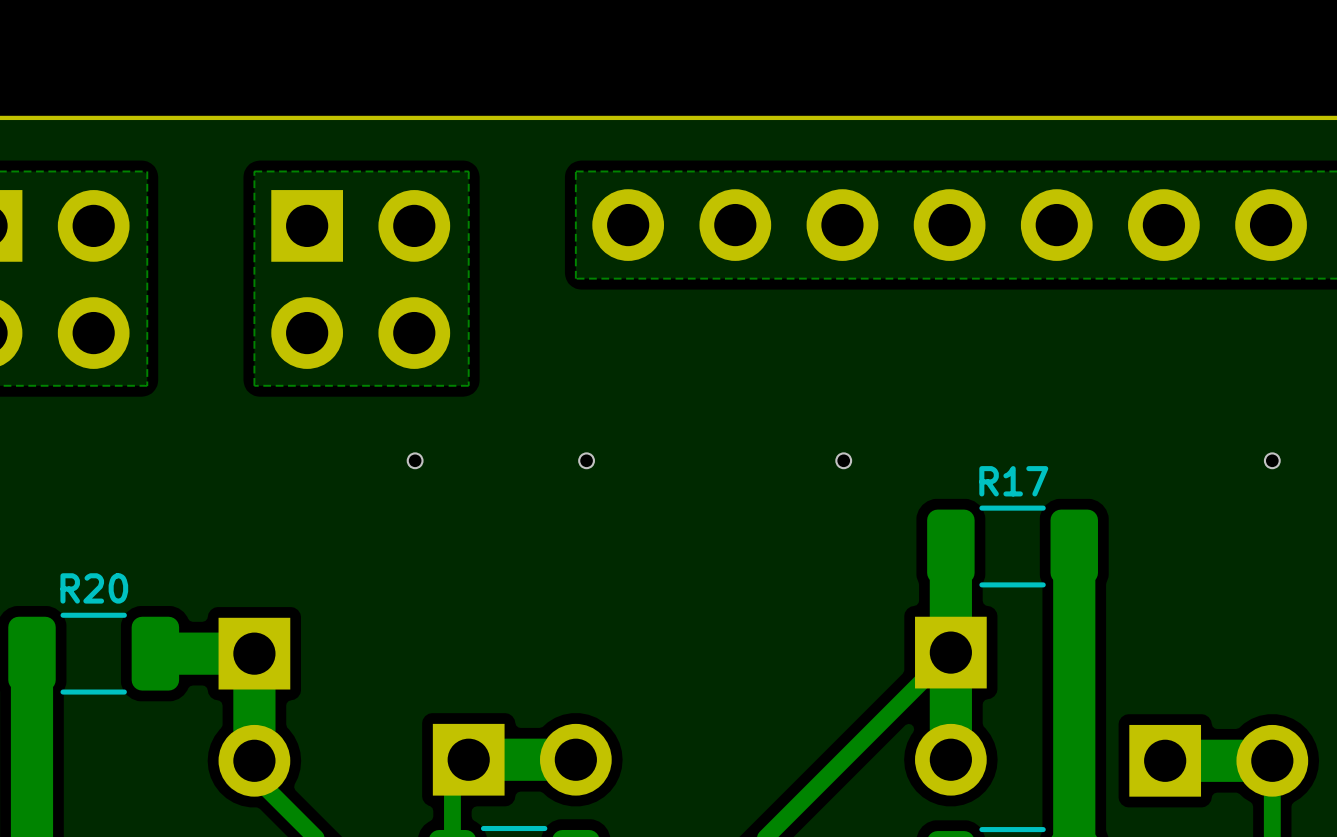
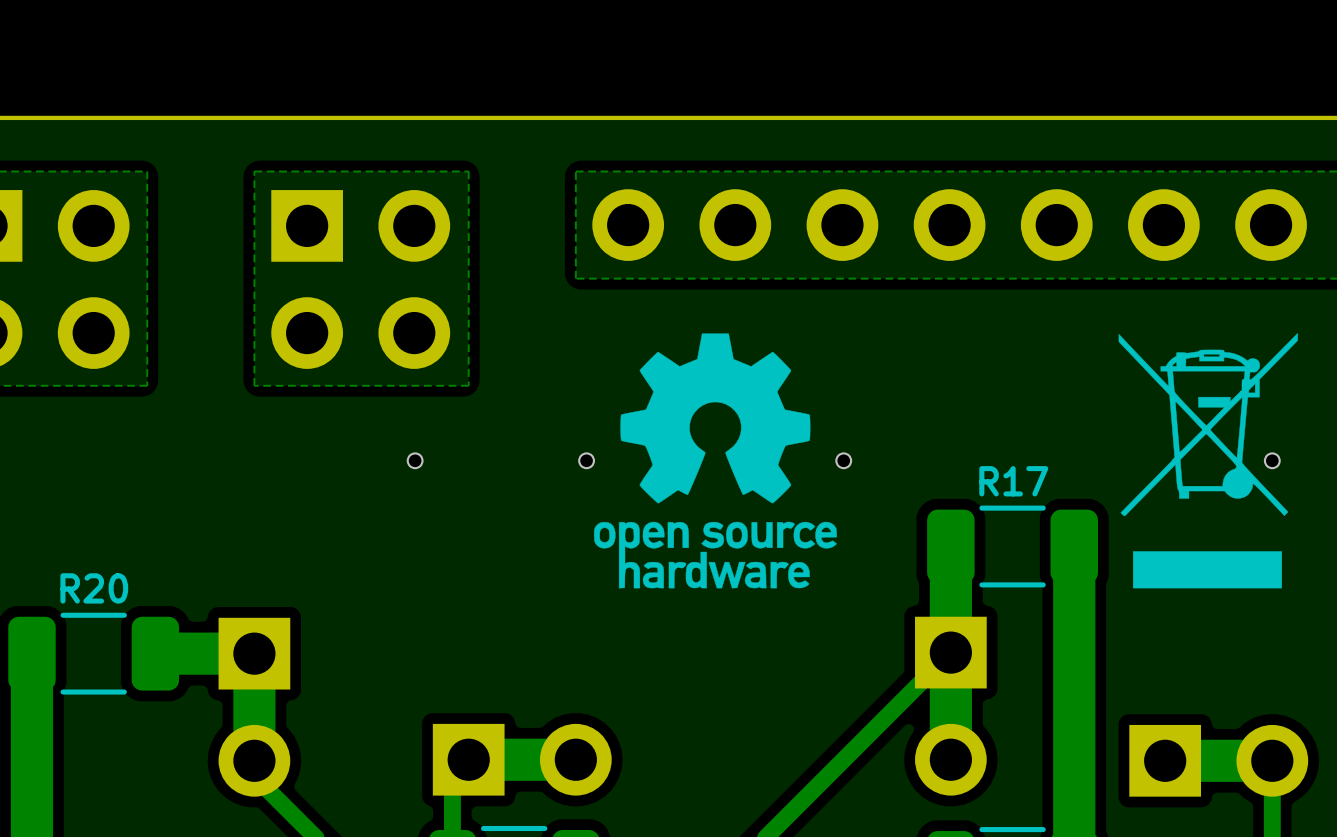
drawing: none -> [594, 333, 837, 589]
drawing: none -> [1118, 333, 1298, 589]

